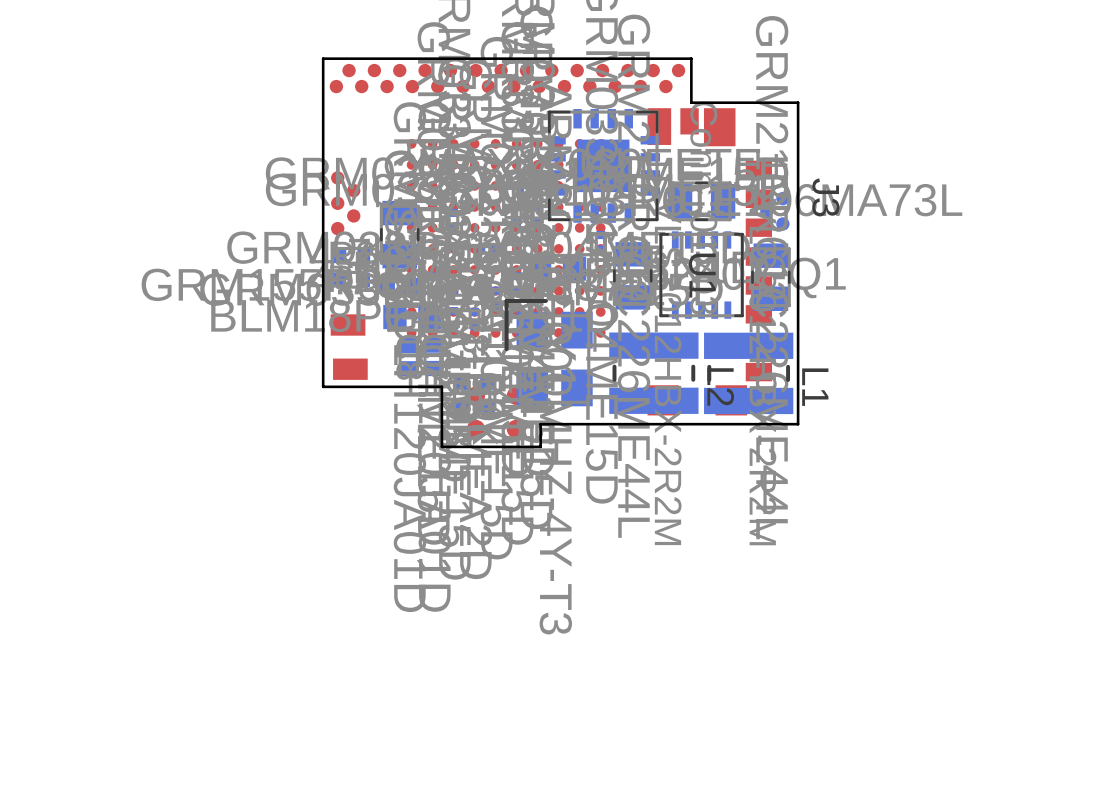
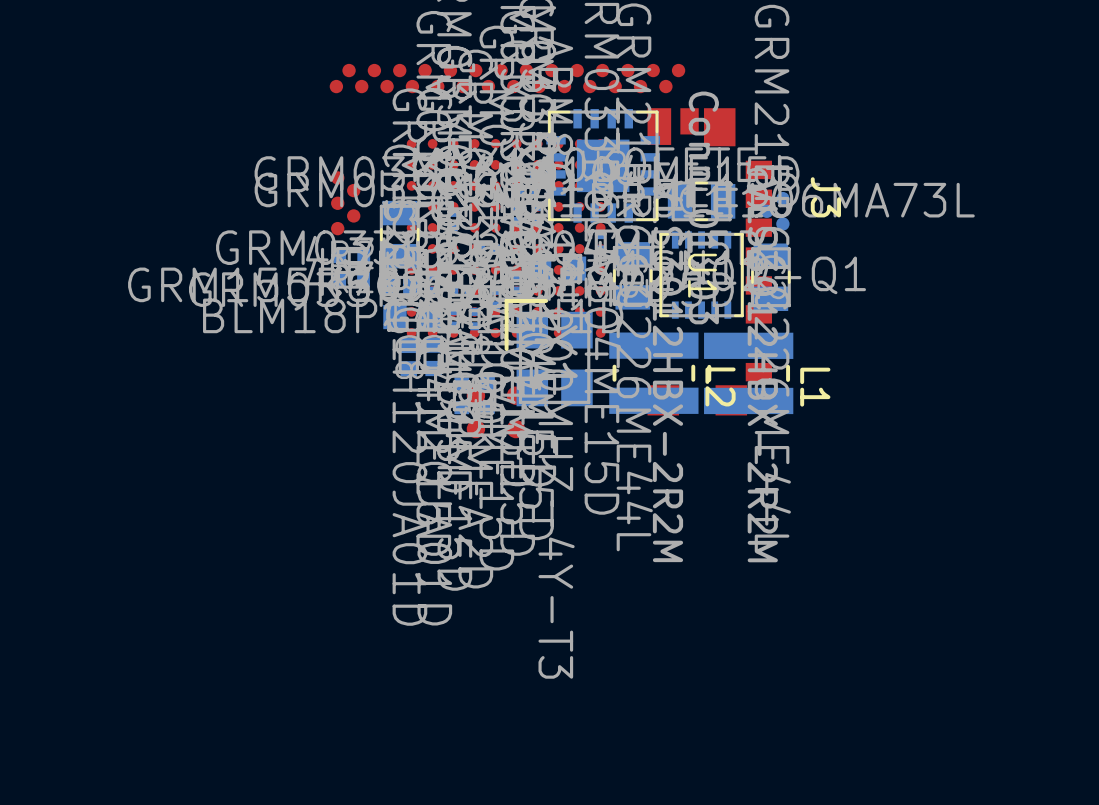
board edge: (691, 58) (323, 58) (323, 386) (441, 386) (441, 446) (540, 446) (540, 424) (798, 424) (798, 102) (691, 102) (691, 58) -> none
part: (348, 325) -> none
part: (350, 369) -> none

